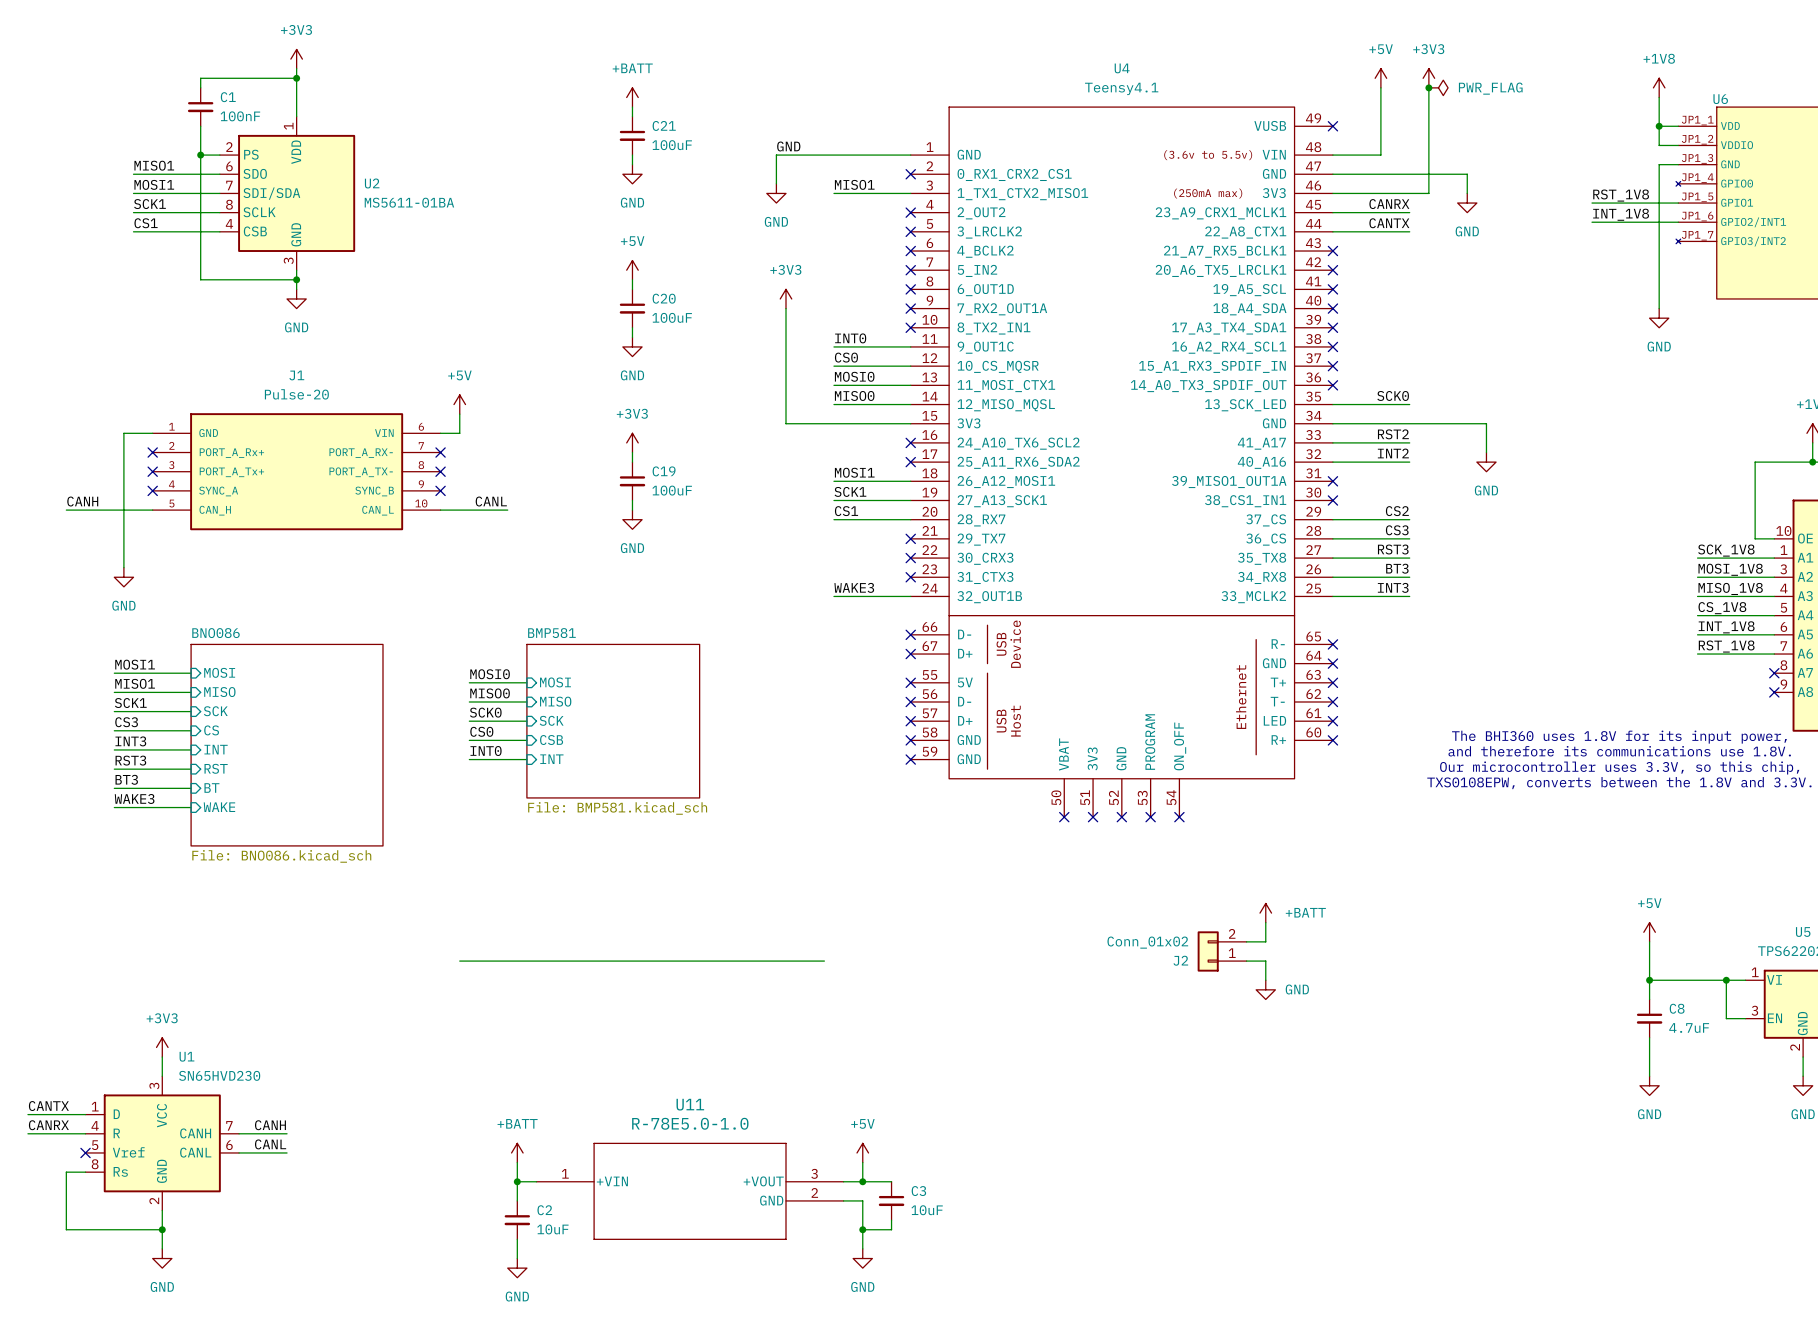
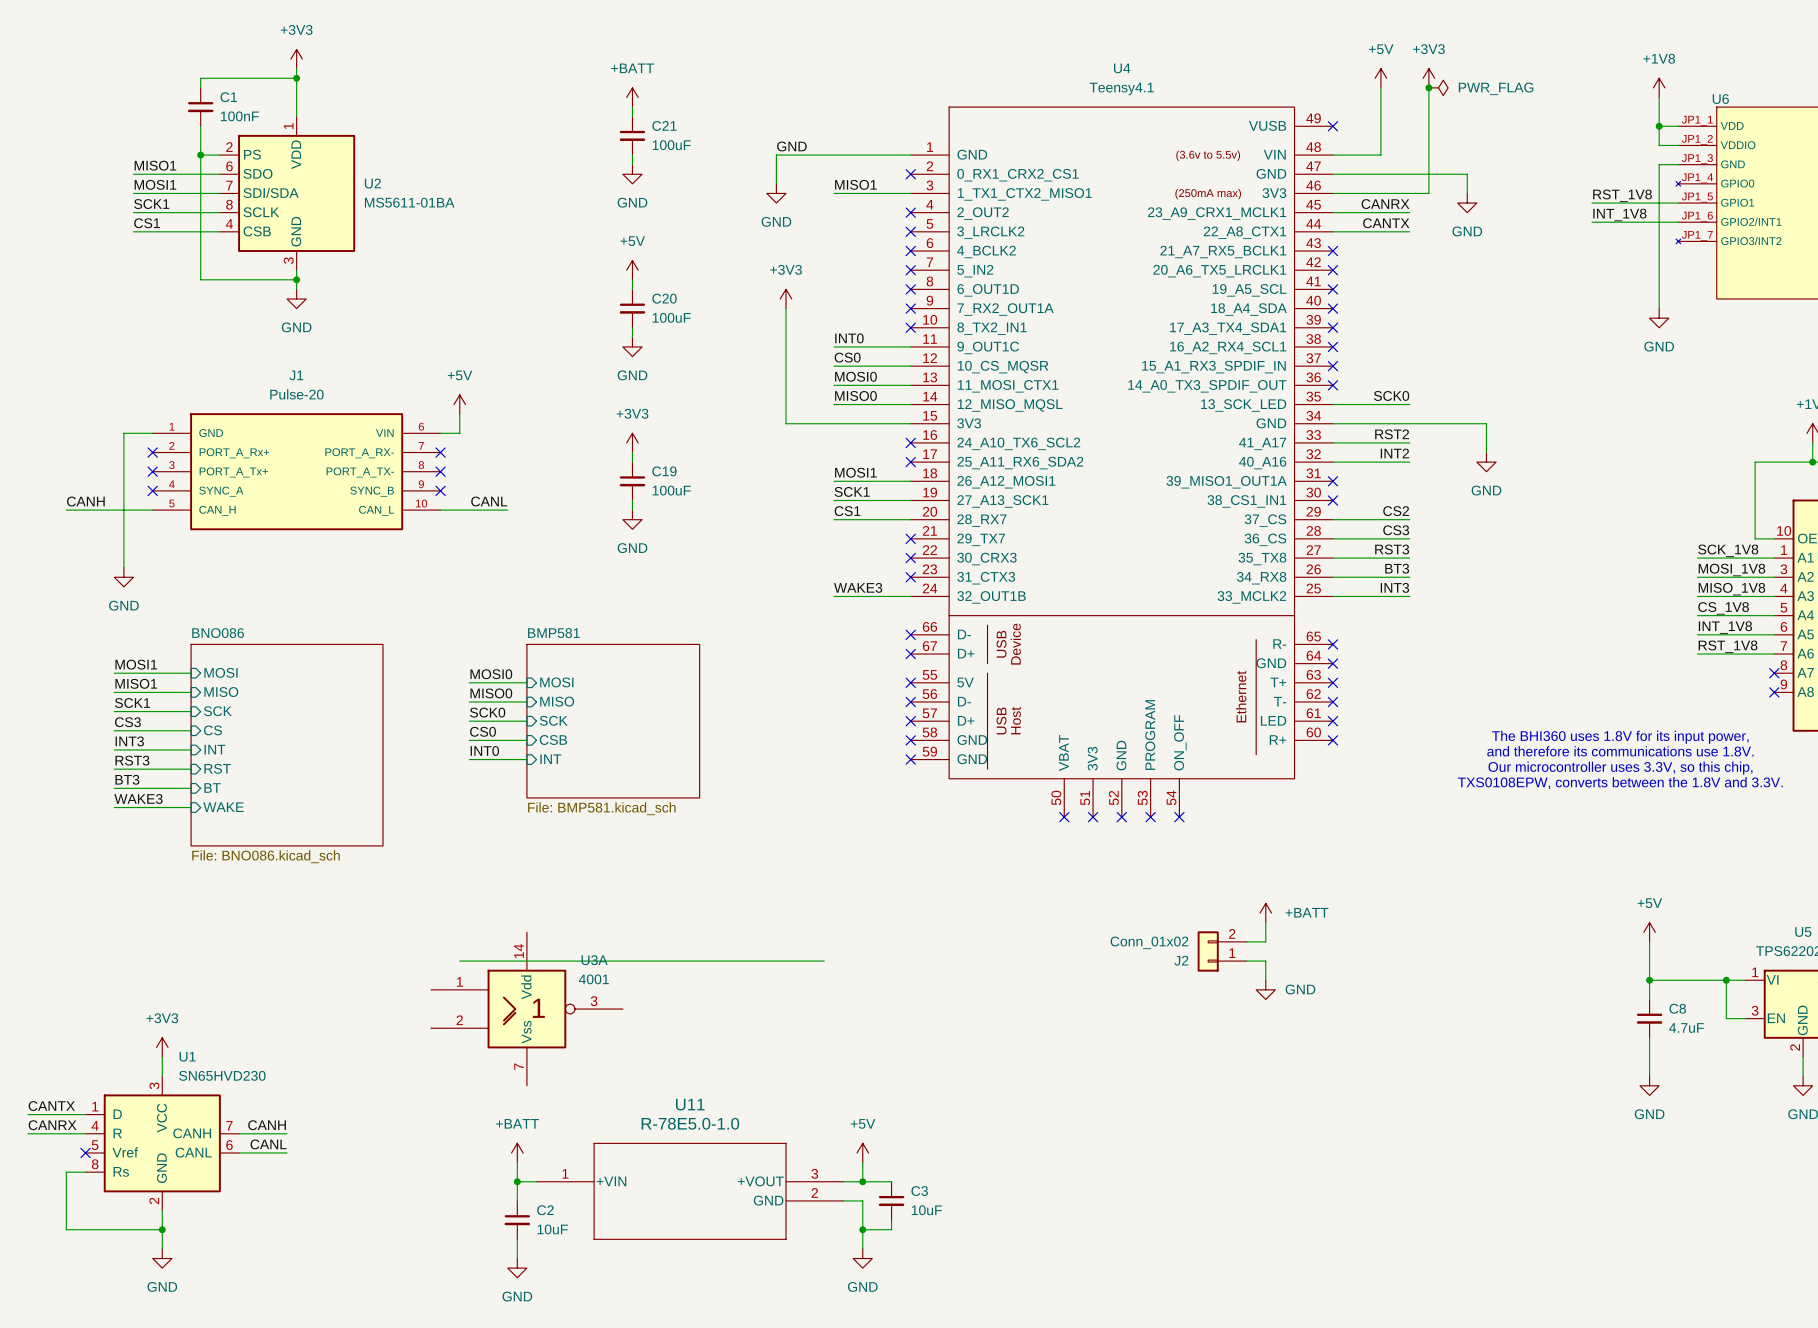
U3A: none -> 4001 (526, 1009)

